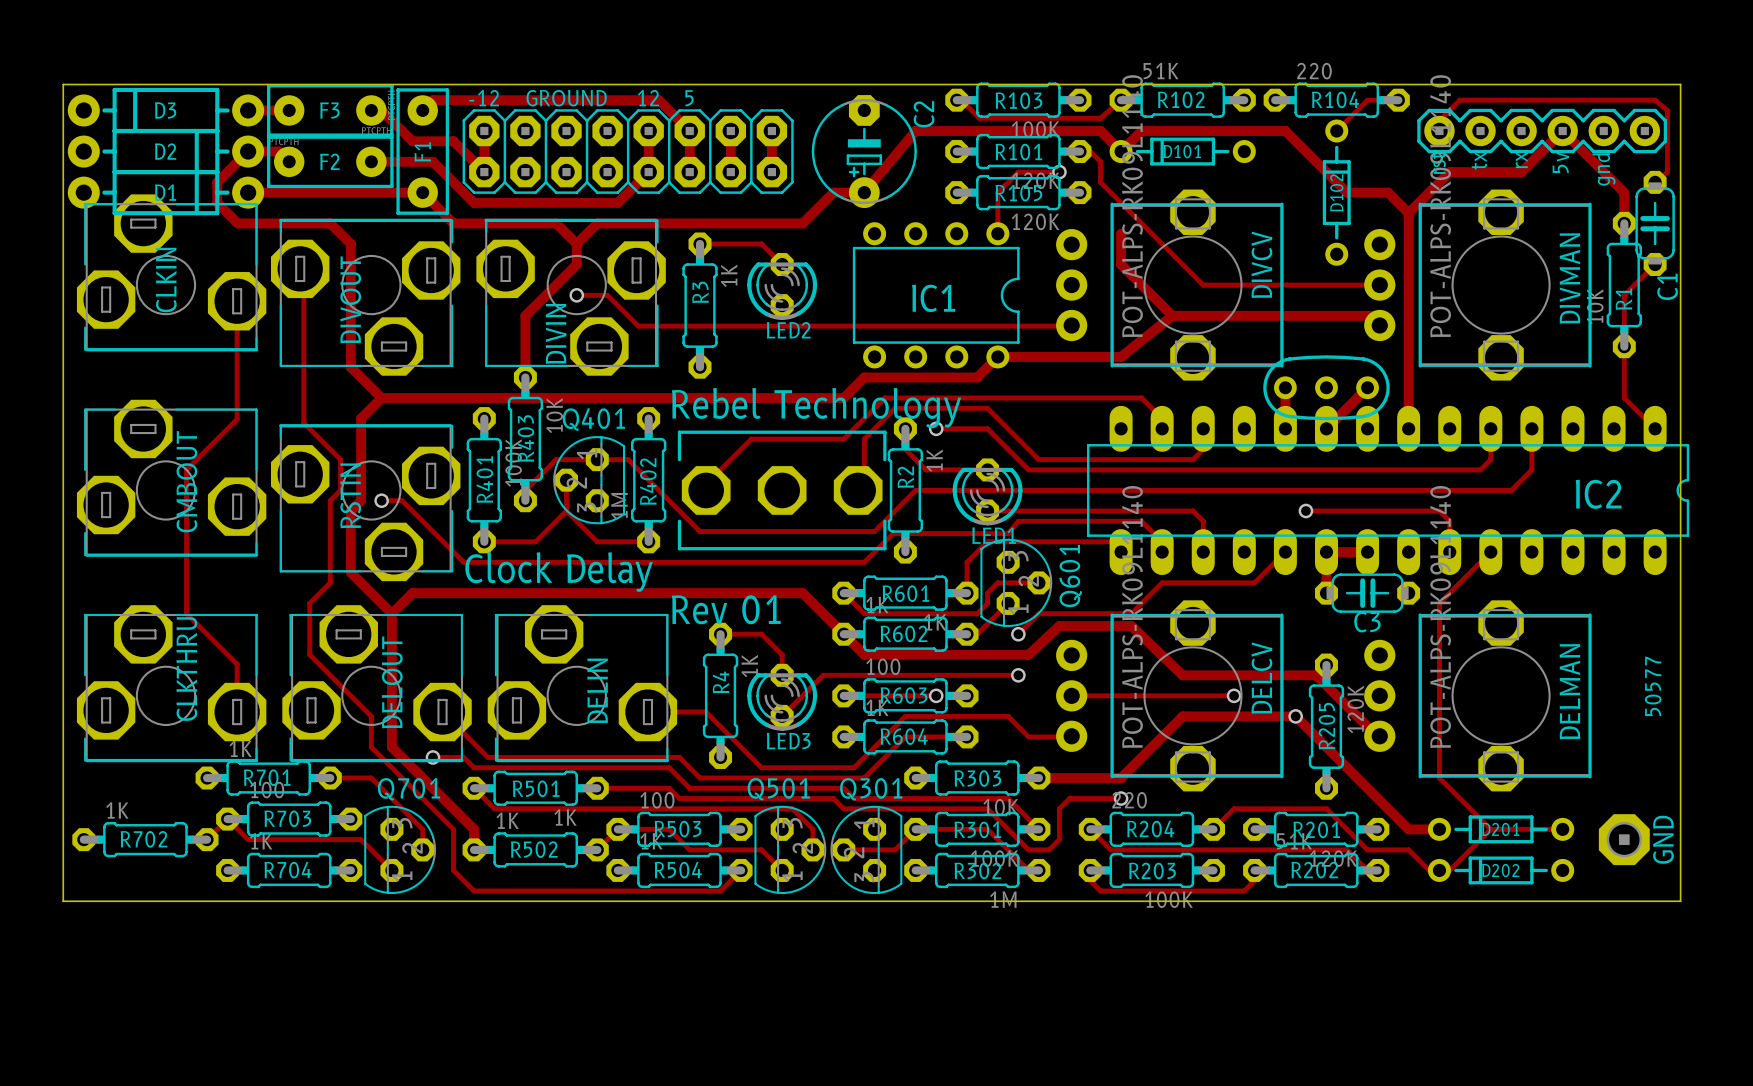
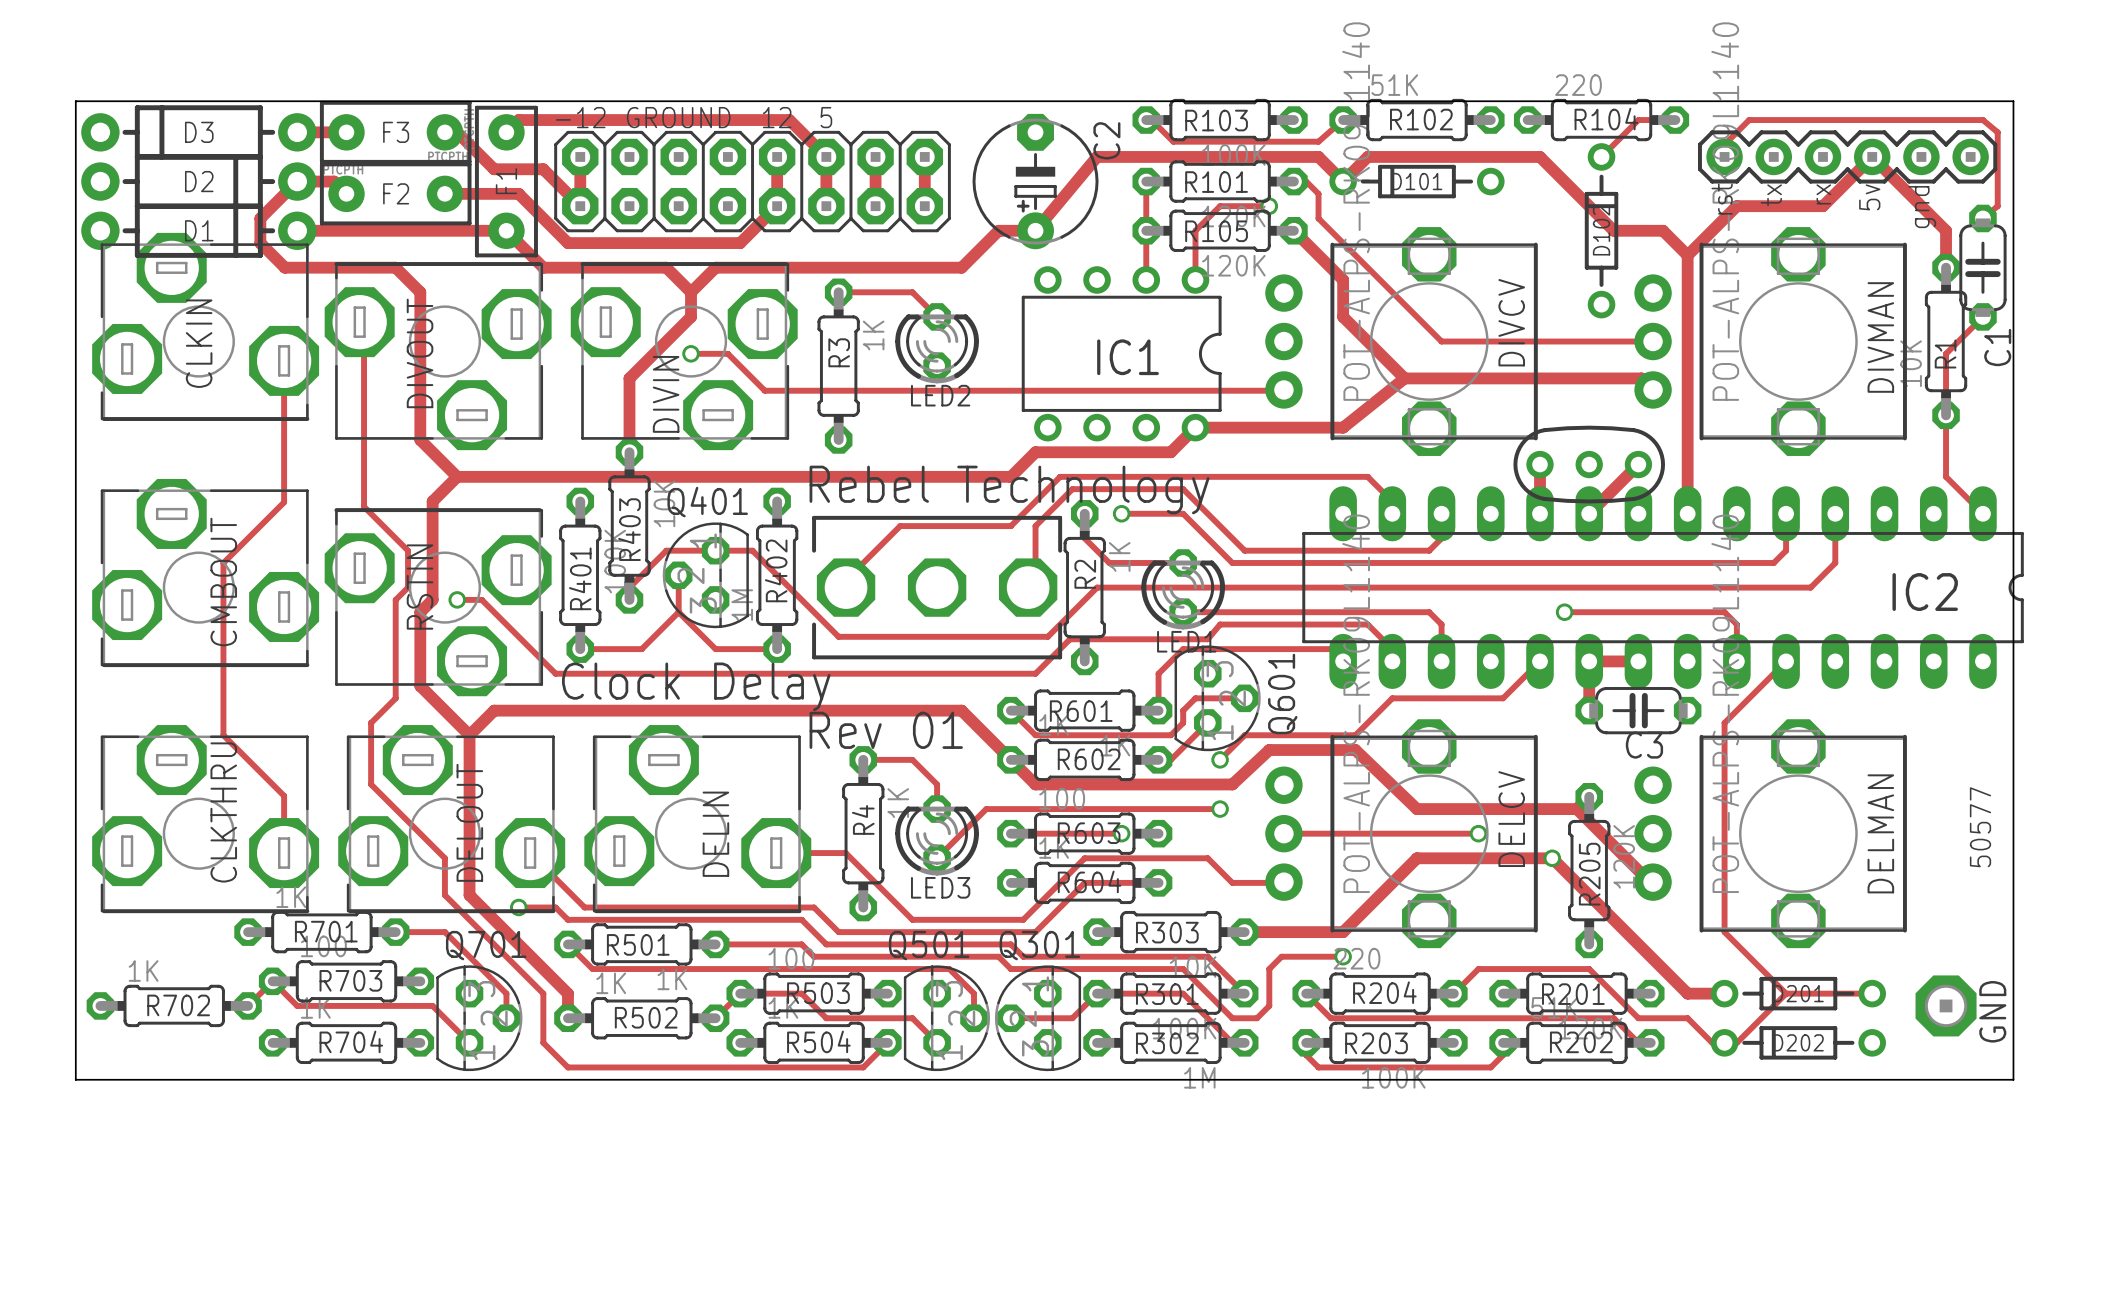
track: none -> (1146, 181) (1146, 279)
track: none -> (1293, 230) (1343, 279)

